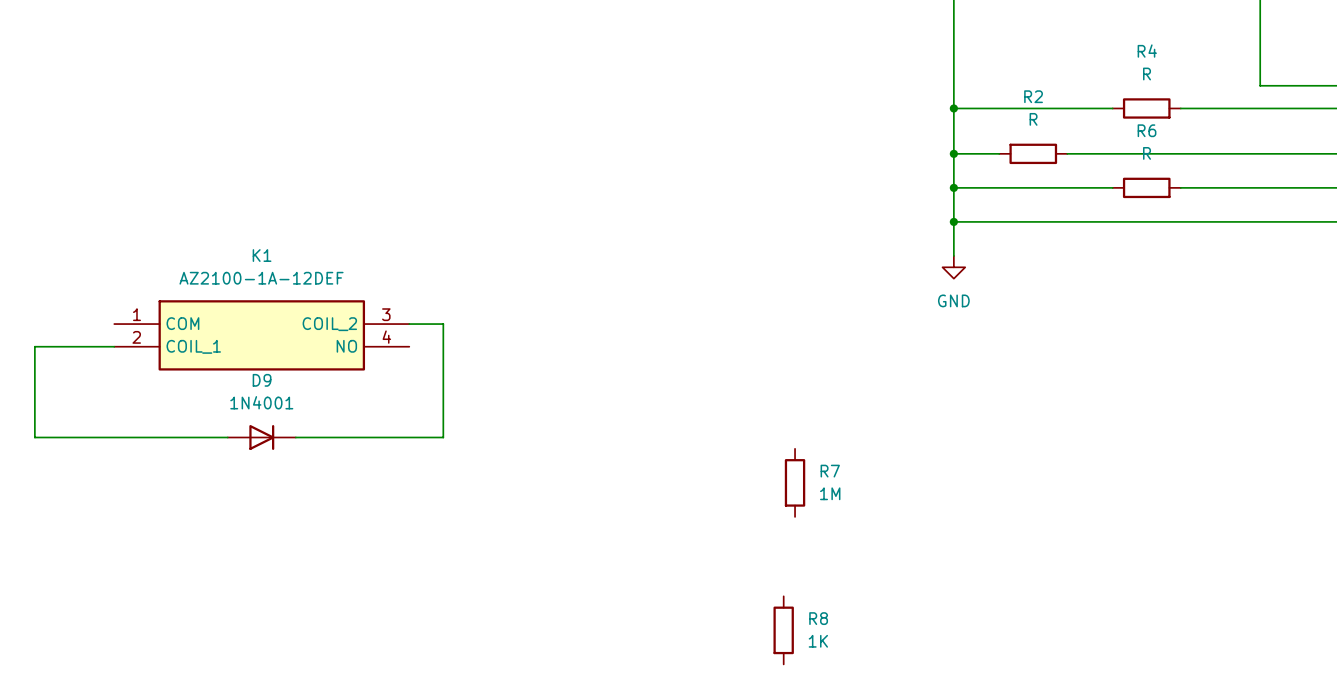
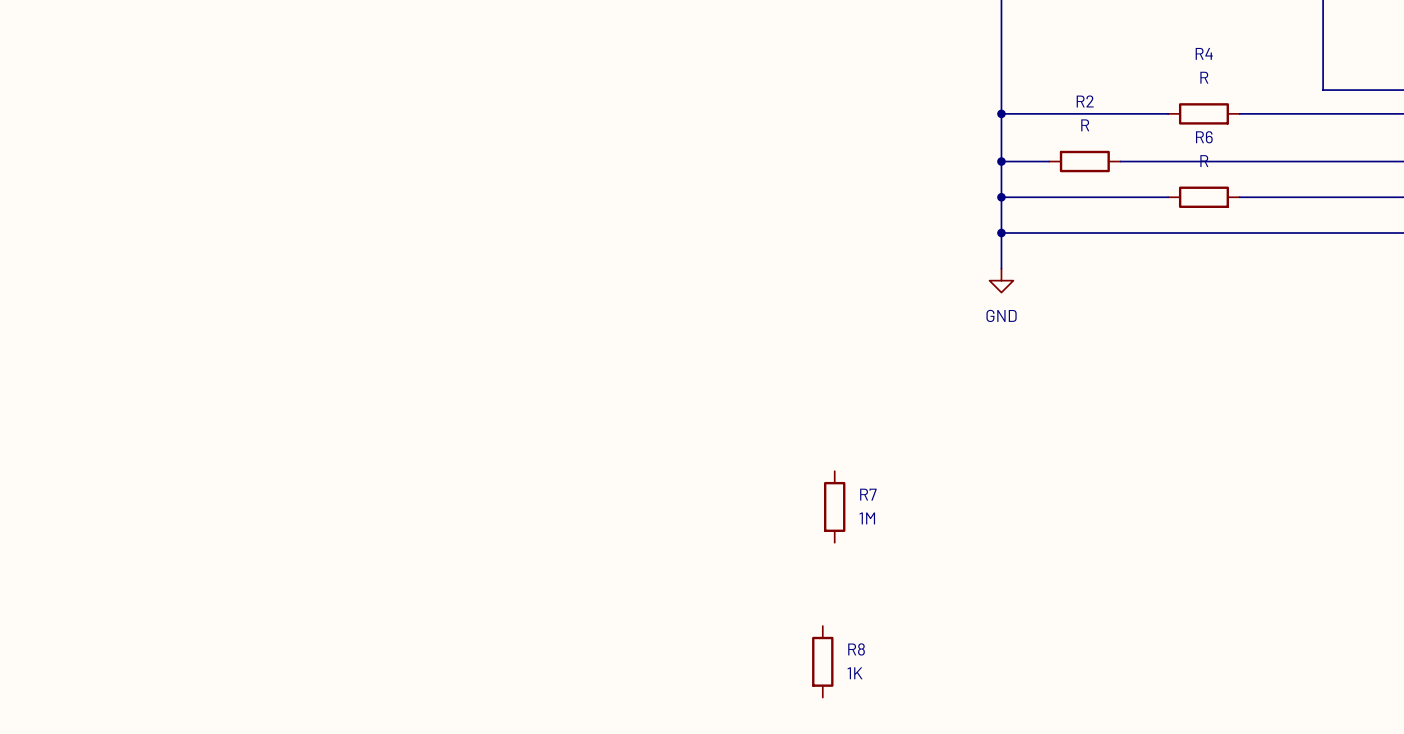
wire: (409, 324) (443, 324) (443, 437) (295, 437) -> none
K1: AZ2100-1A-12DEF (261, 335) -> none
wire: (114, 346) (34, 346) (34, 437) (227, 437) -> none
D9: 1N4001 (261, 437) -> none

